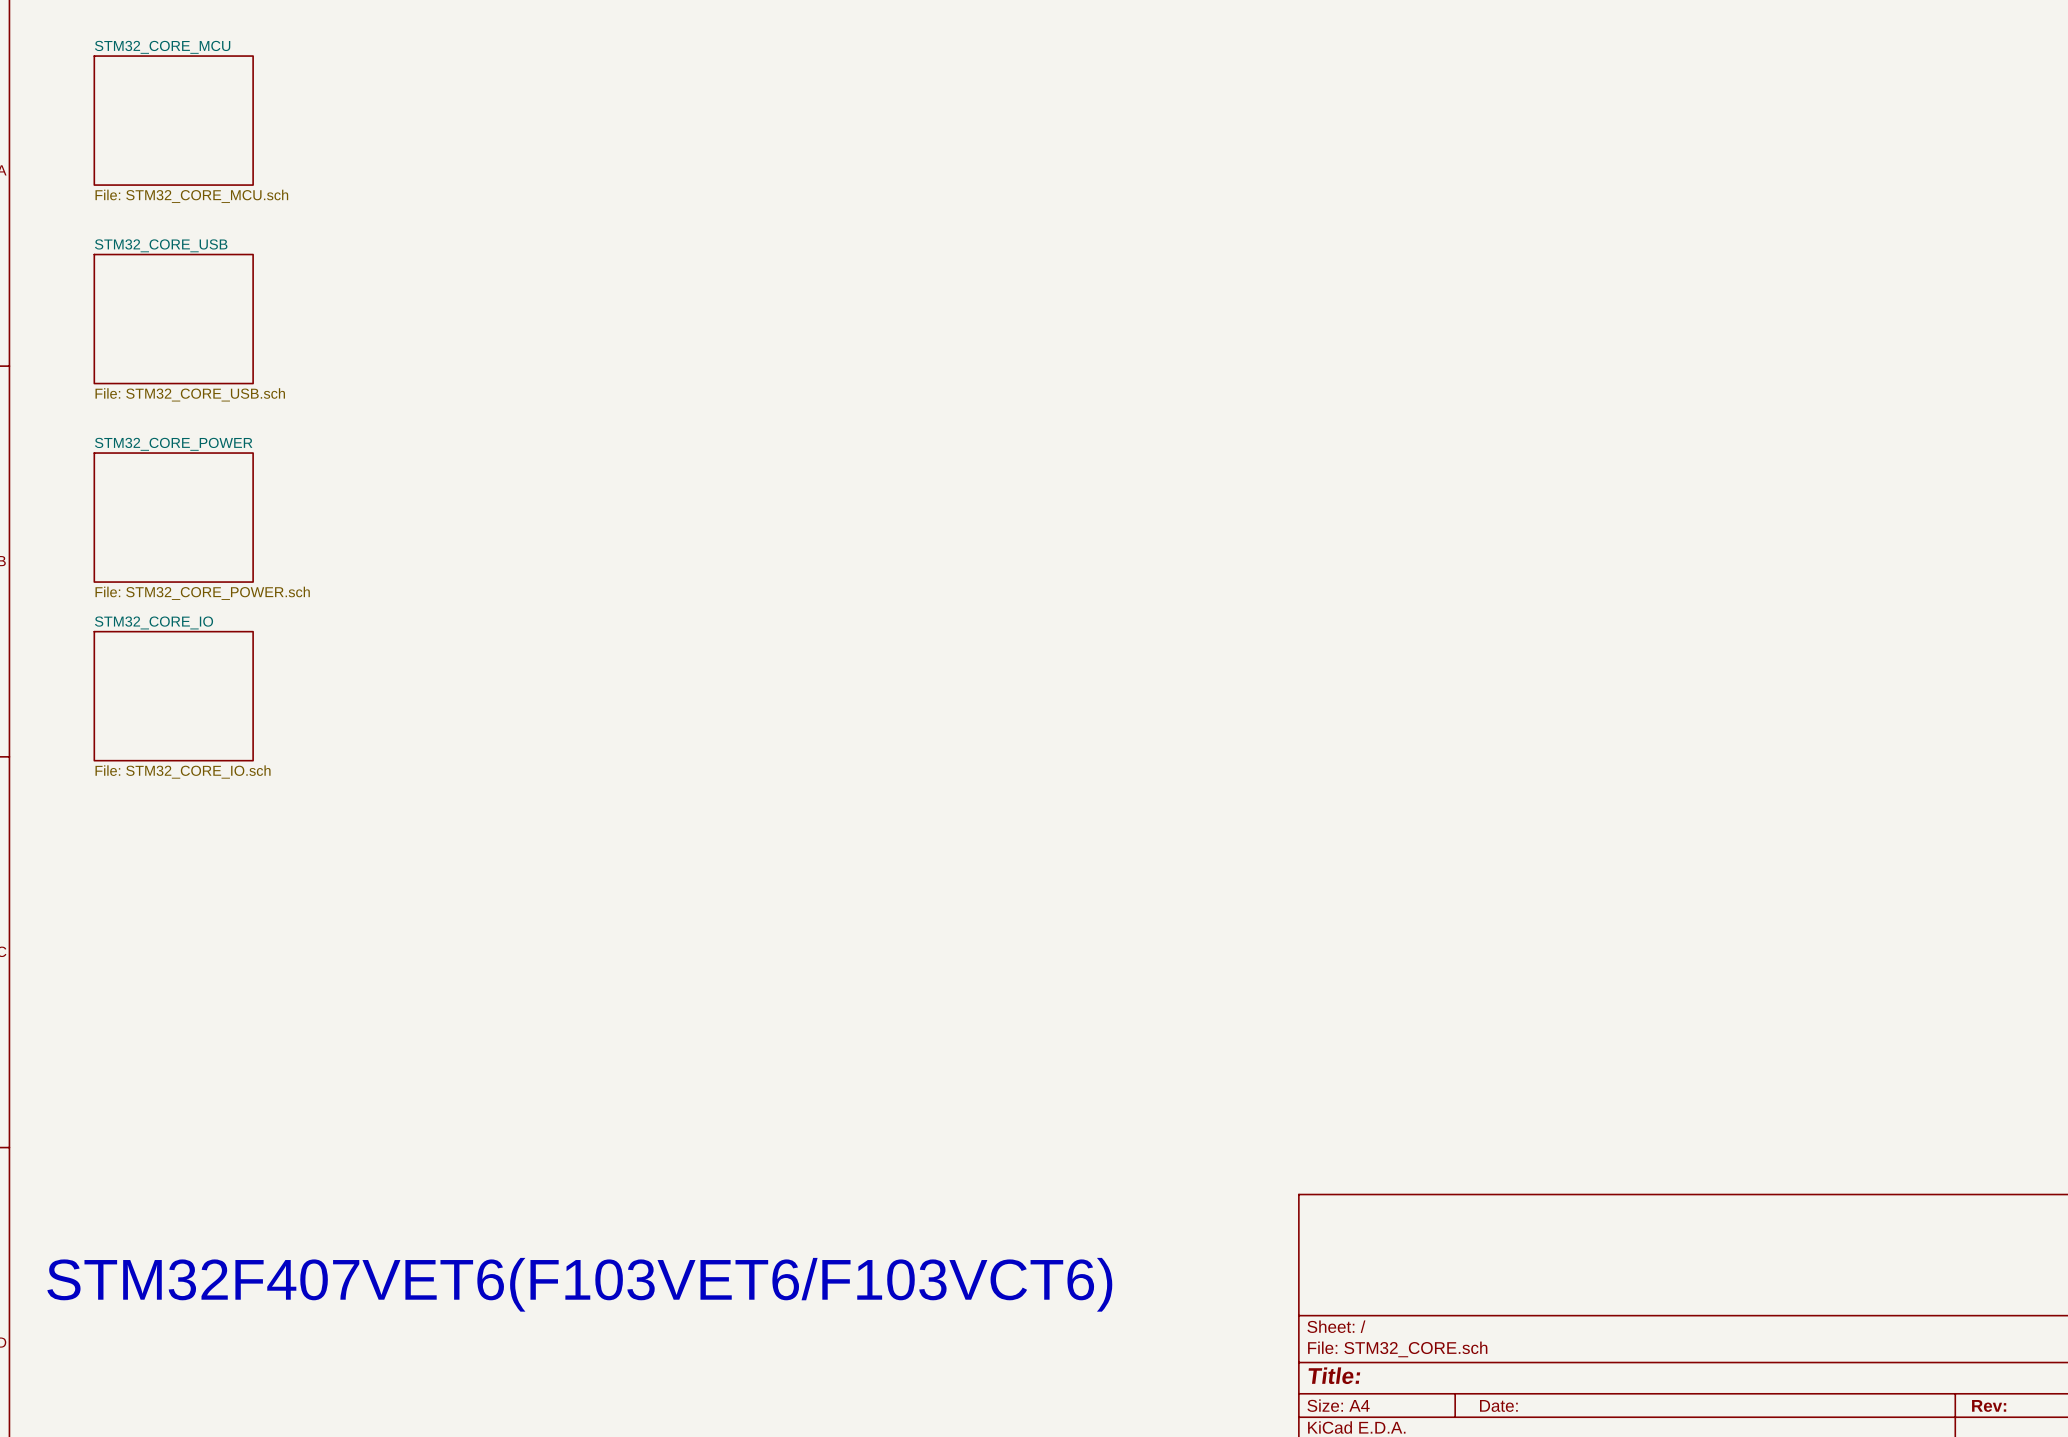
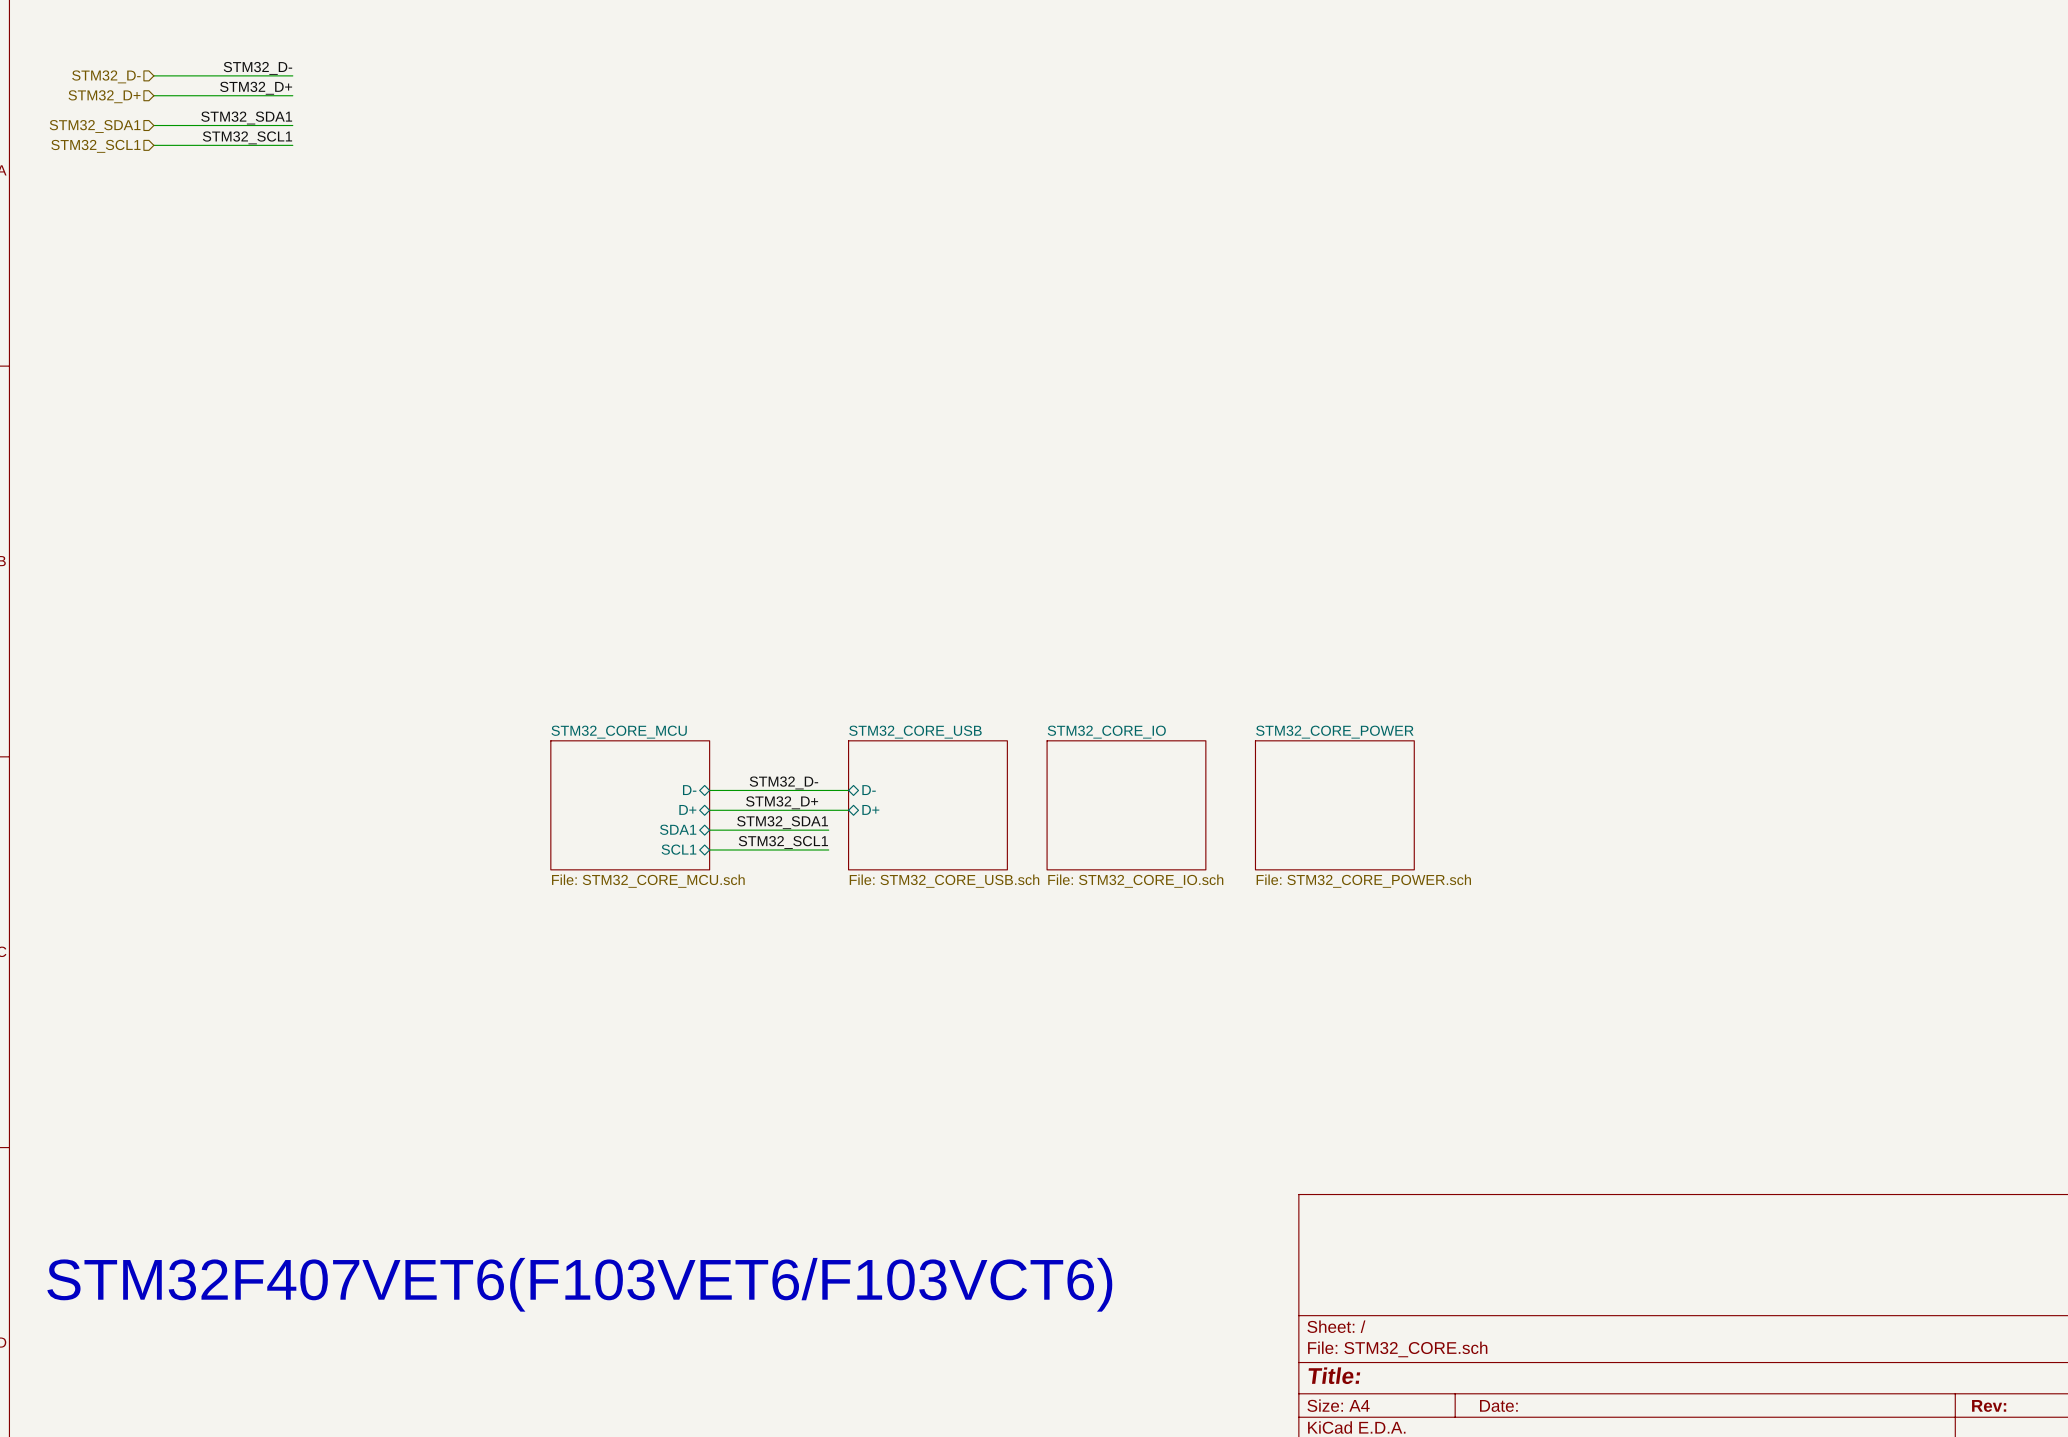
label: none -> STM32_D- (257, 68)
wire: none -> (153, 75) (292, 75)
hierarchical label: none -> STM32_D- (106, 76)
label: none -> STM32_D+ (256, 88)
wire: none -> (153, 95) (292, 95)
hierarchical label: none -> STM32_D+ (104, 96)
label: none -> STM32_SDA1 (246, 118)
sheet STM32_CORE_MCU position: (173, 120) -> (630, 805)
wire: none -> (153, 125) (292, 125)
hierarchical label: none -> STM32_SDA1 (95, 126)
label: none -> STM32_SCL1 (247, 137)
wire: none -> (153, 145) (292, 145)
hierarchical label: none -> STM32_SCL1 (95, 146)
sheet STM32_CORE_USB position: (173, 319) -> (927, 805)
sheet STM32_CORE_POWER position: (173, 517) -> (1334, 805)
sheet STM32_CORE_IO position: (173, 696) -> (1126, 805)
label: none -> STM32_D- (783, 782)
sheet pin: none -> D- (689, 790)
wire: none -> (709, 790) (848, 790)
sheet pin: none -> D- (869, 790)
label: none -> STM32_D+ (782, 802)
sheet pin: none -> D+ (687, 809)
sheet pin: none -> D+ (870, 809)
wire: none -> (709, 810) (848, 810)
label: none -> STM32_SDA1 (782, 822)
sheet pin: none -> SDA1 (678, 829)
wire: none -> (709, 830) (828, 830)
label: none -> STM32_SCL1 (783, 842)
sheet pin: none -> SCL1 (678, 849)
wire: none -> (709, 850) (828, 850)

